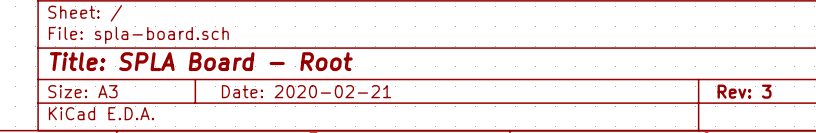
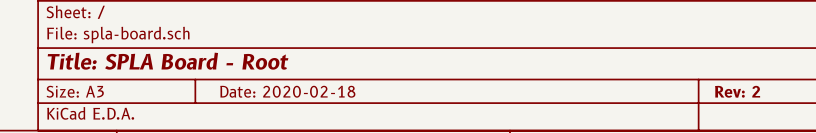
title block: Date: 2020-02-21 (306, 91) -> Date: 2020-02-18 (287, 91)
title block: Rev: 3 (744, 91) -> Rev: 2 (737, 91)

